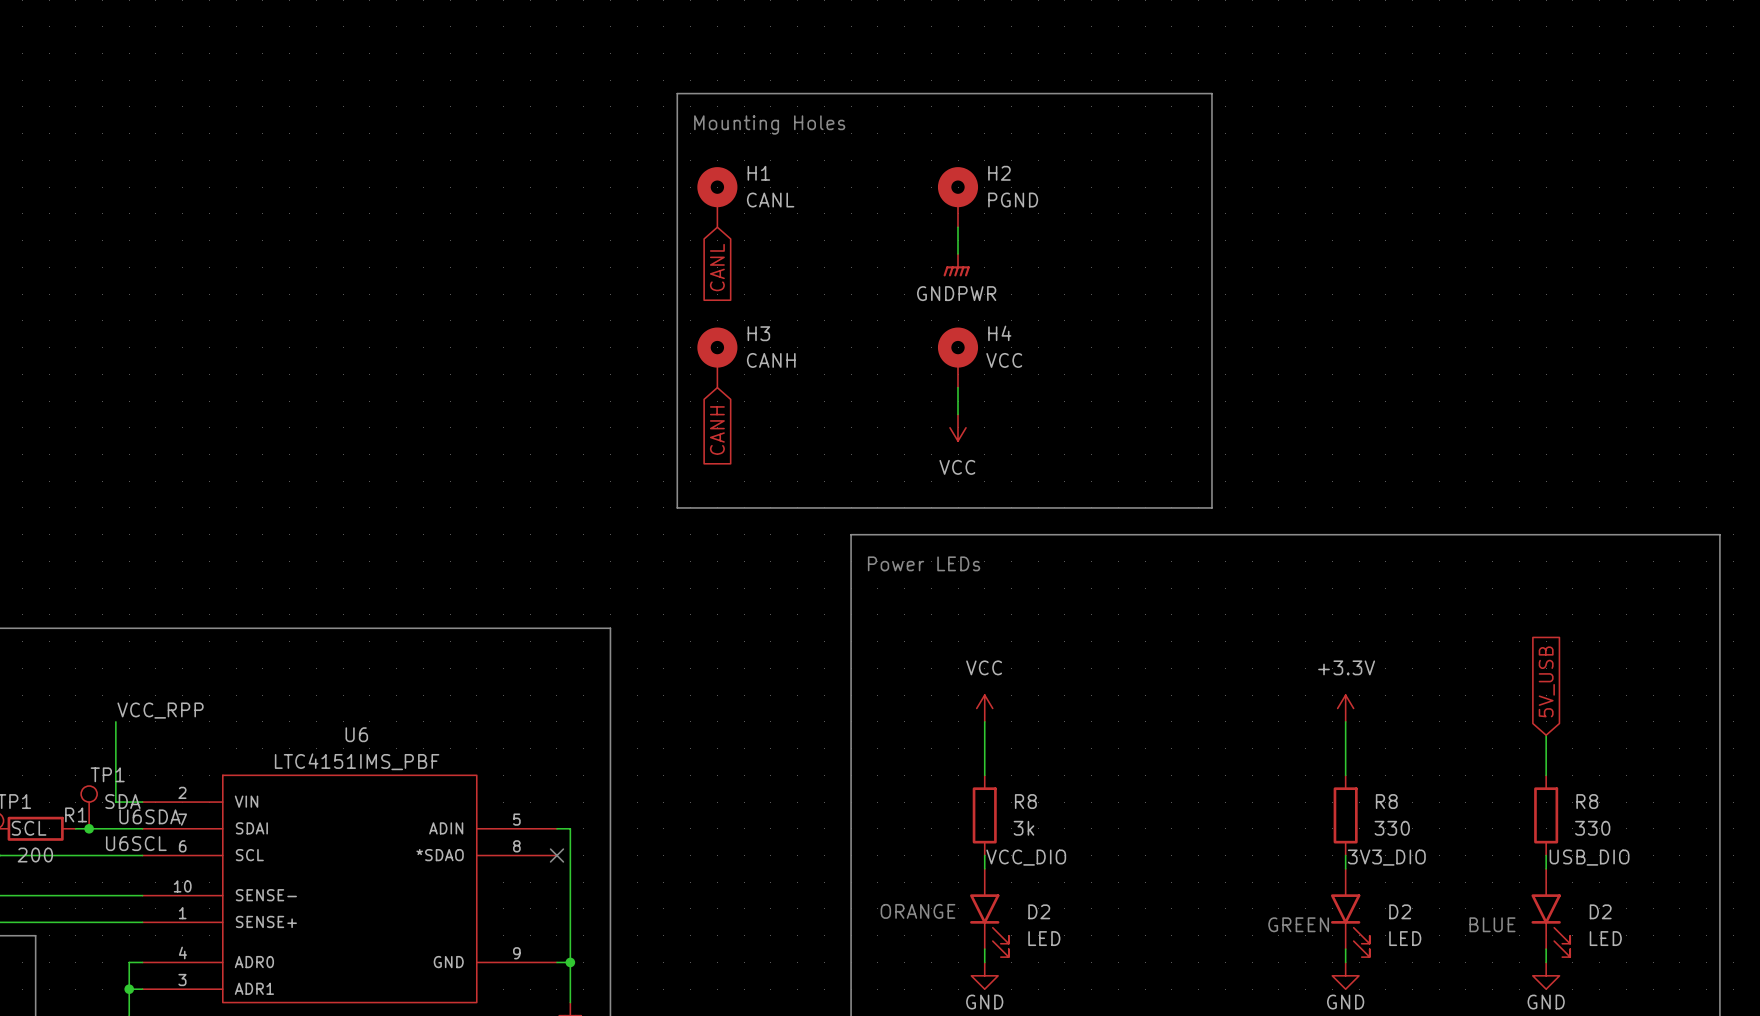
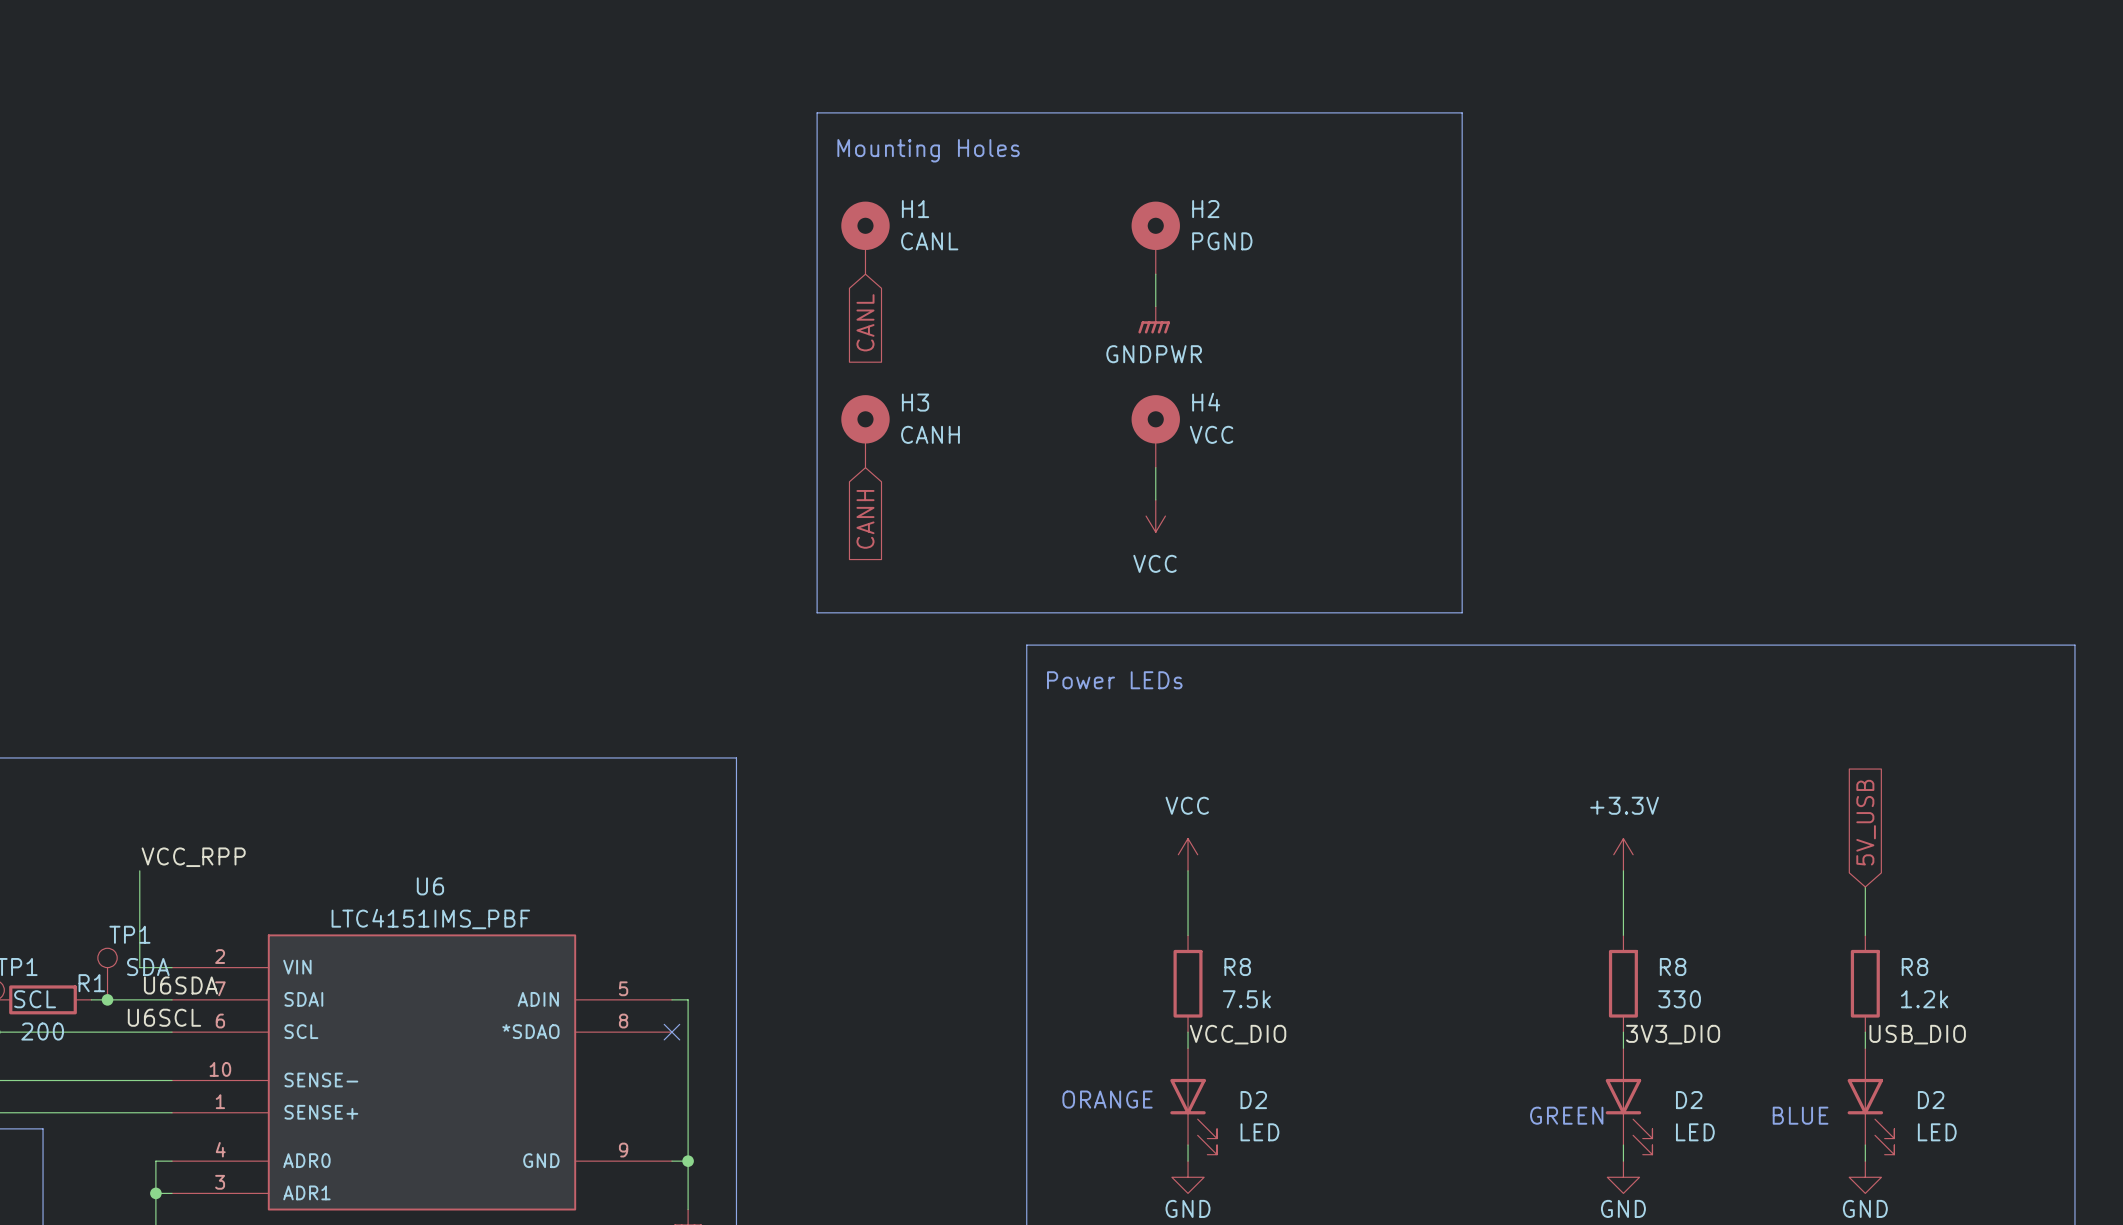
R8 value: 3k (1023, 828) -> 7.5k (1246, 999)
R8 value: 330 (1592, 828) -> 1.2k (1924, 999)
D2 symbol: [970, 868, 1009, 958] -> [1170, 1048, 1218, 1155]
D2 symbol: [1330, 868, 1370, 958] -> [1605, 1048, 1653, 1155]
D2 symbol: [1531, 868, 1571, 958] -> [1847, 1048, 1895, 1155]

